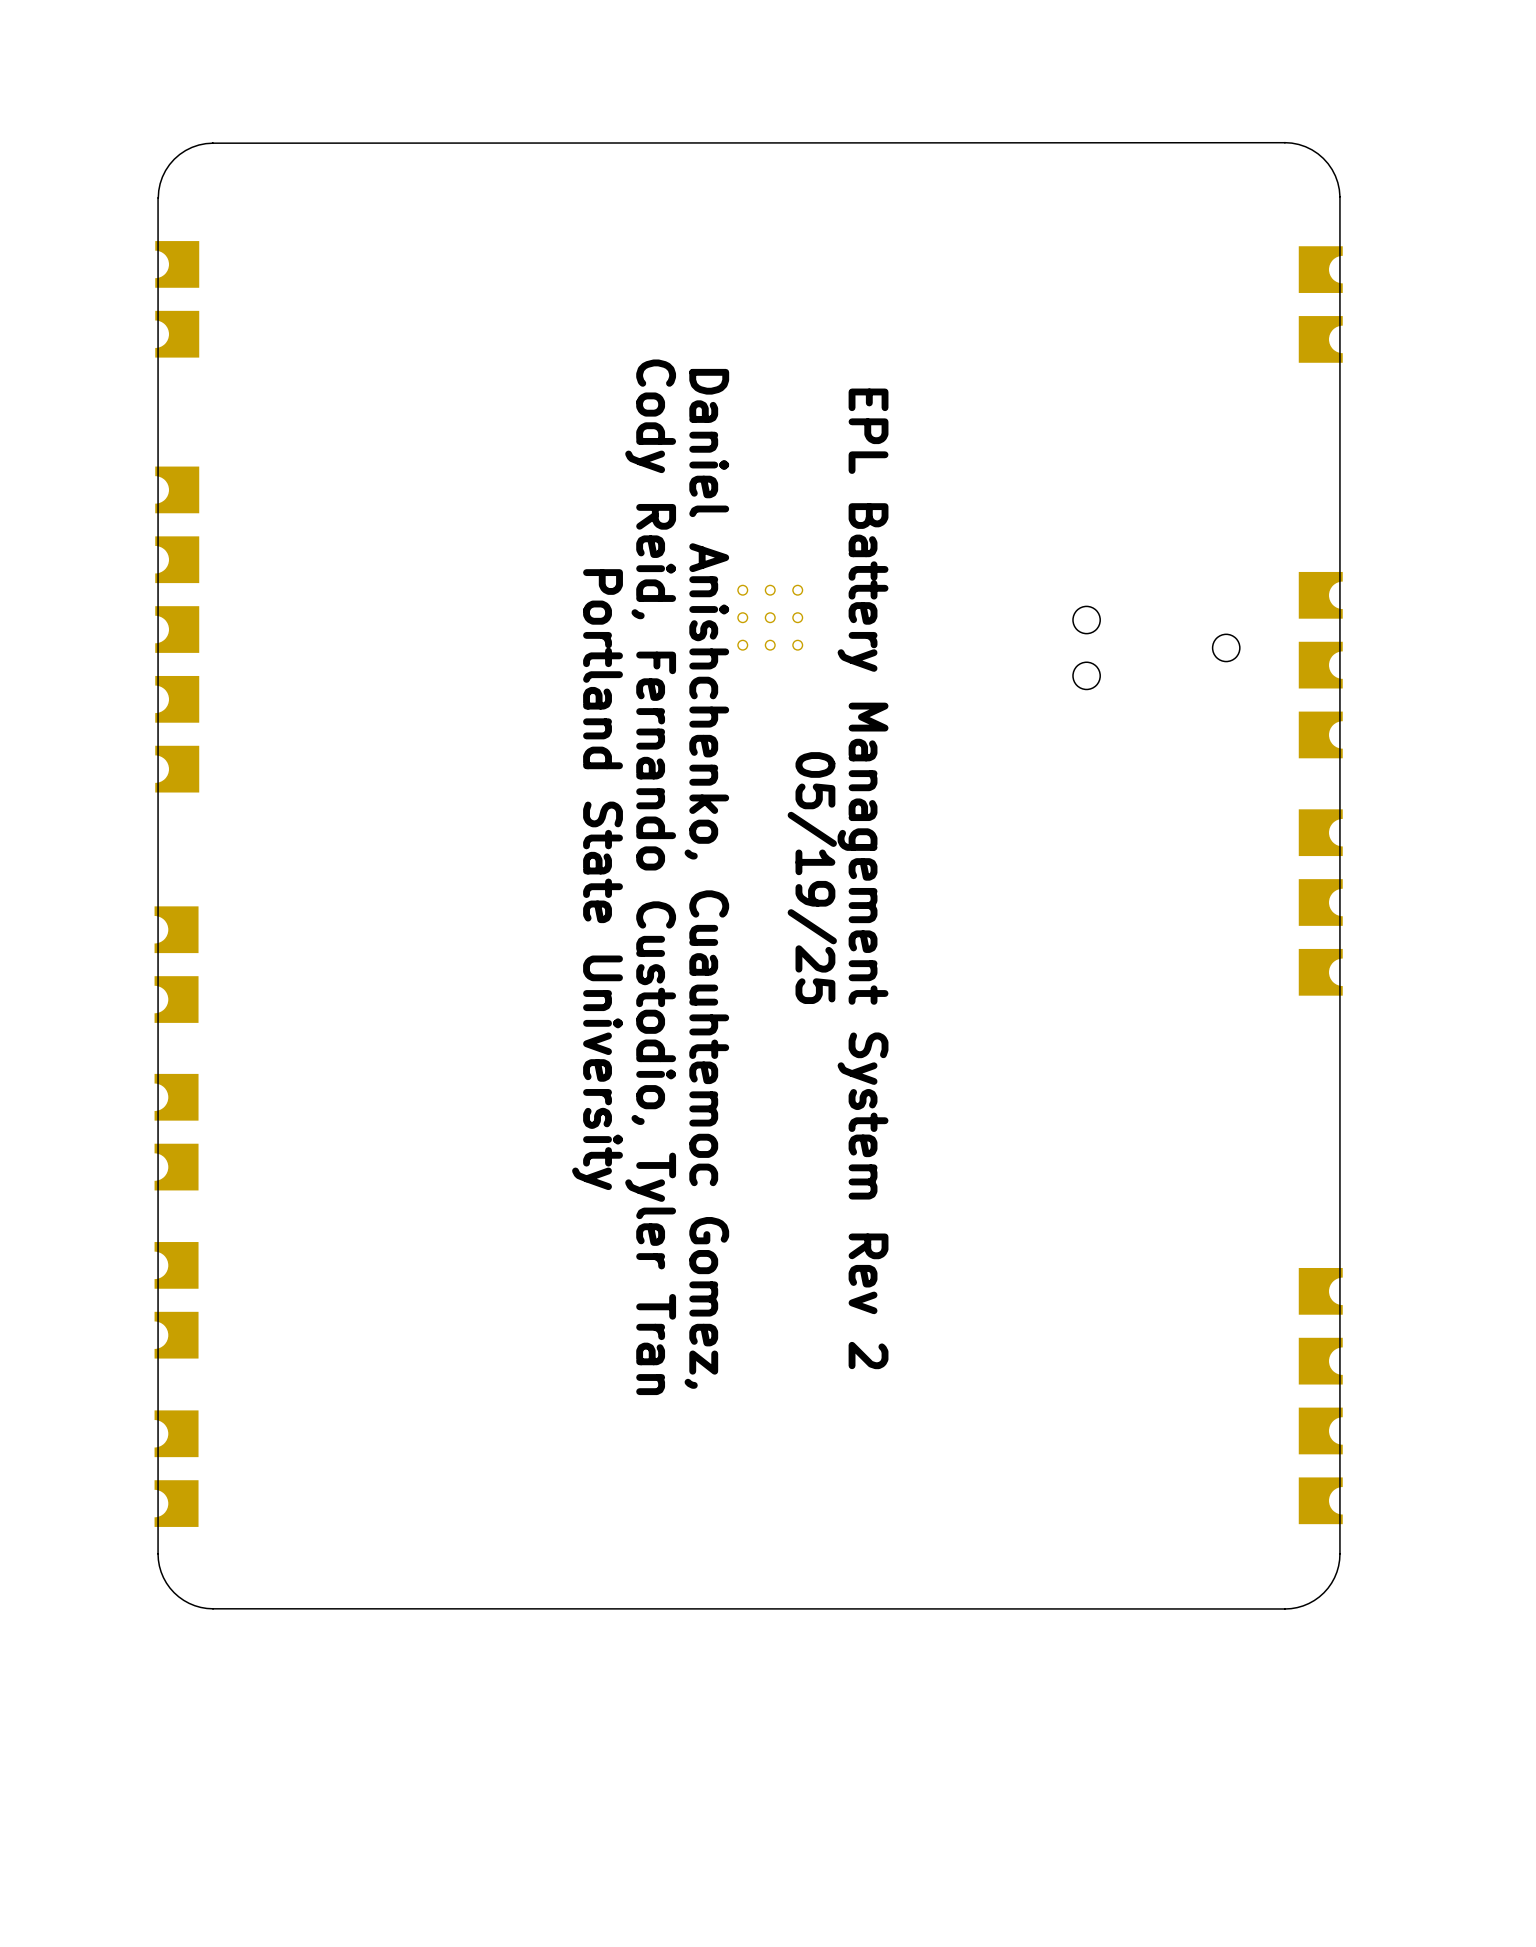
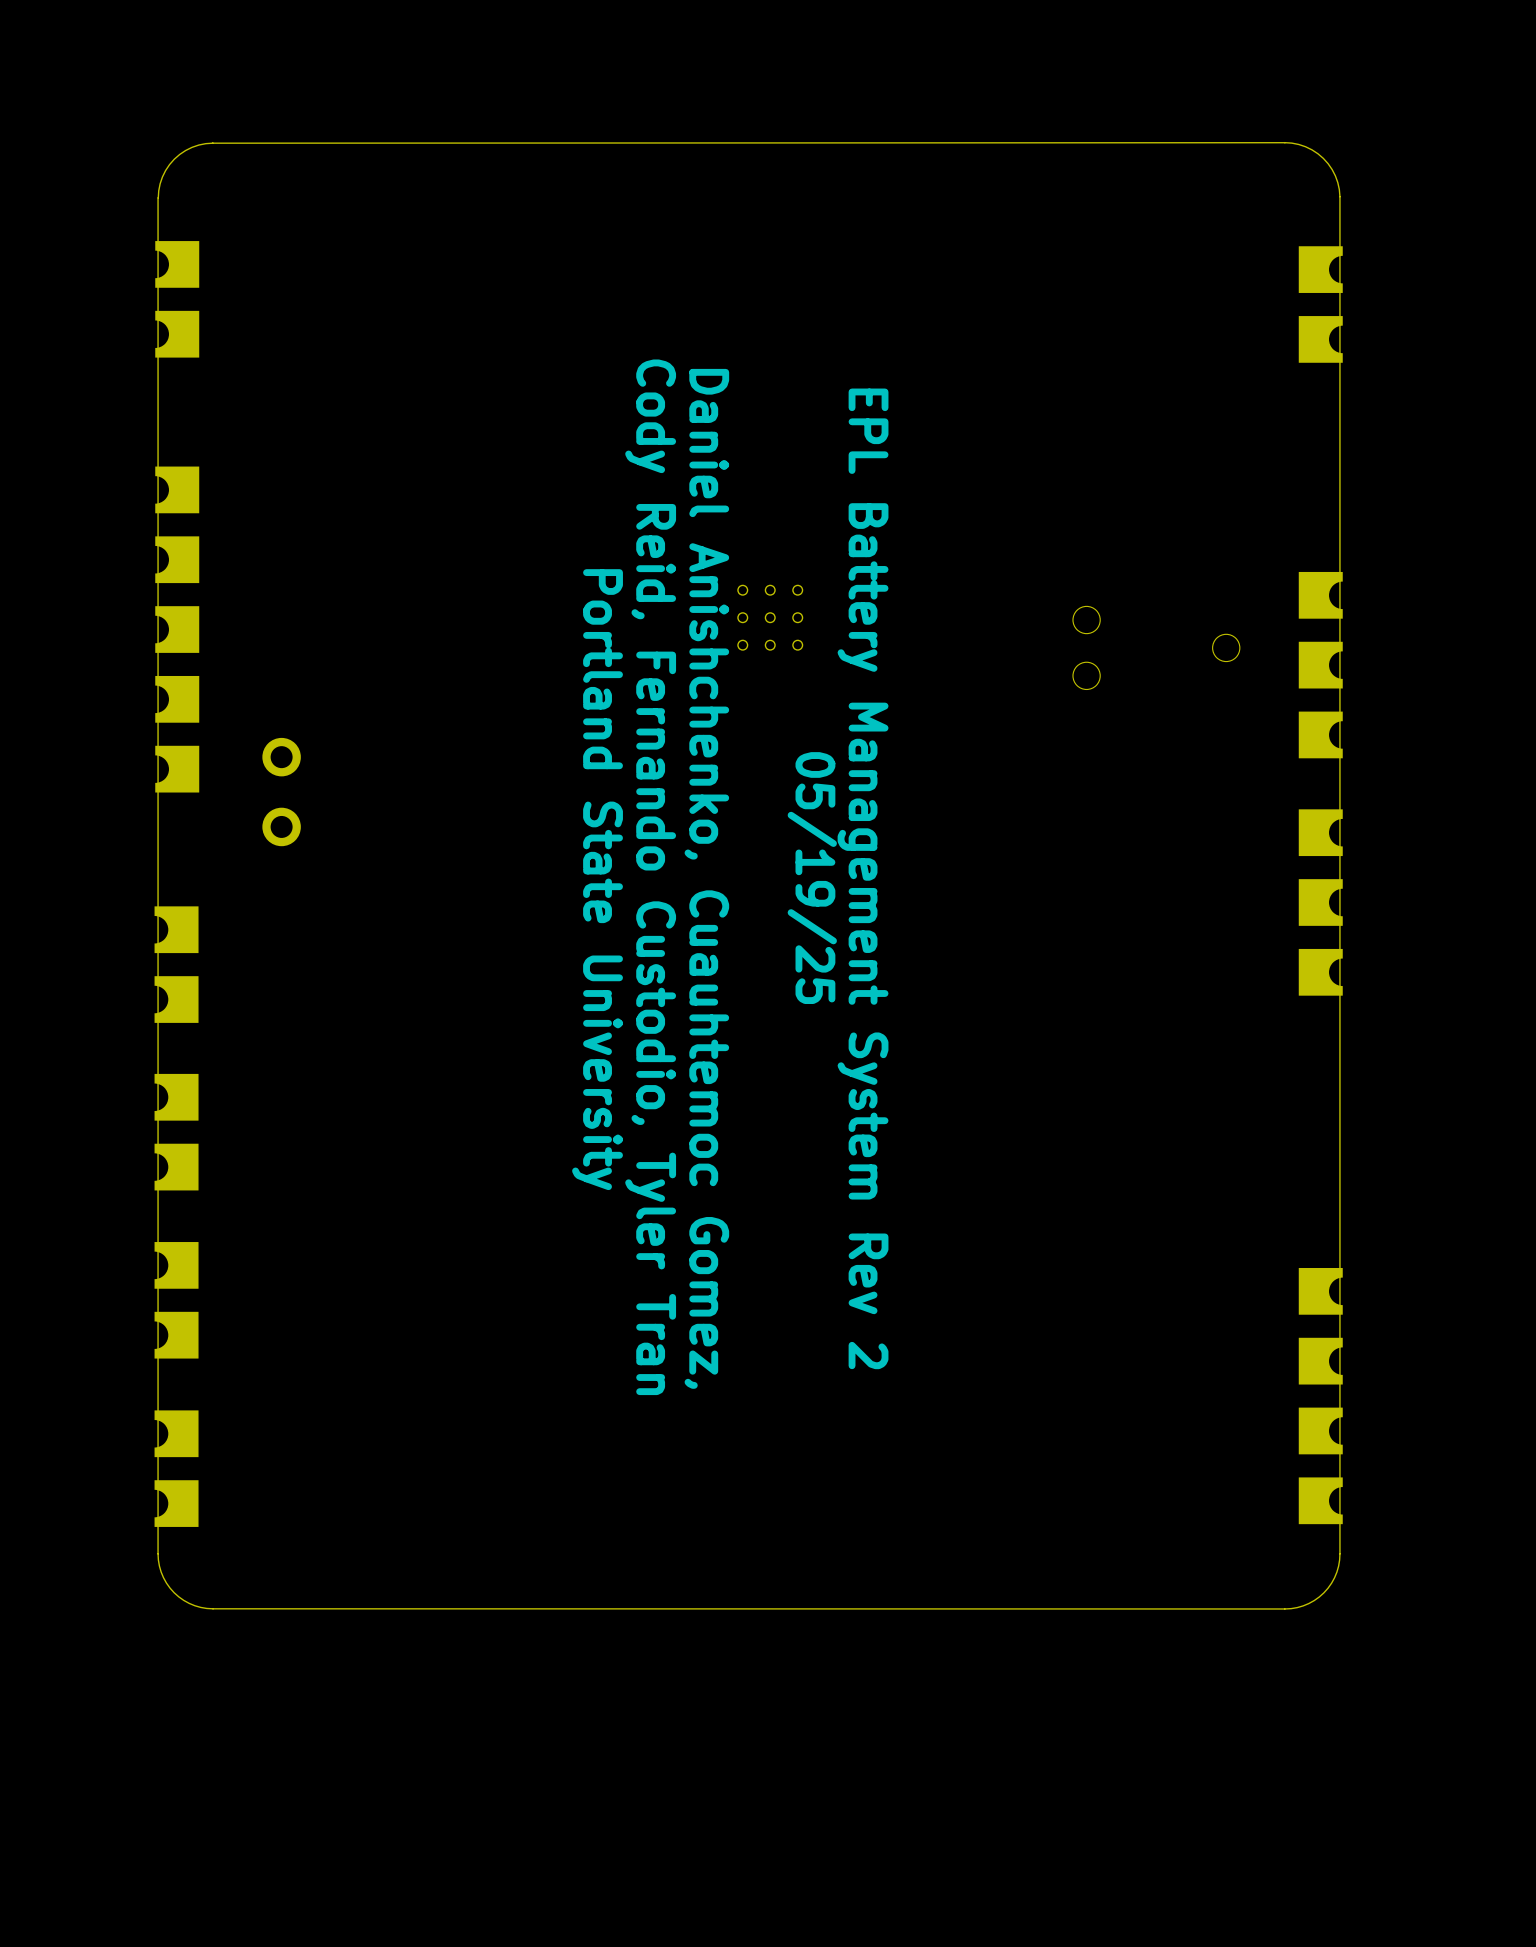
part: none -> (281, 792)

